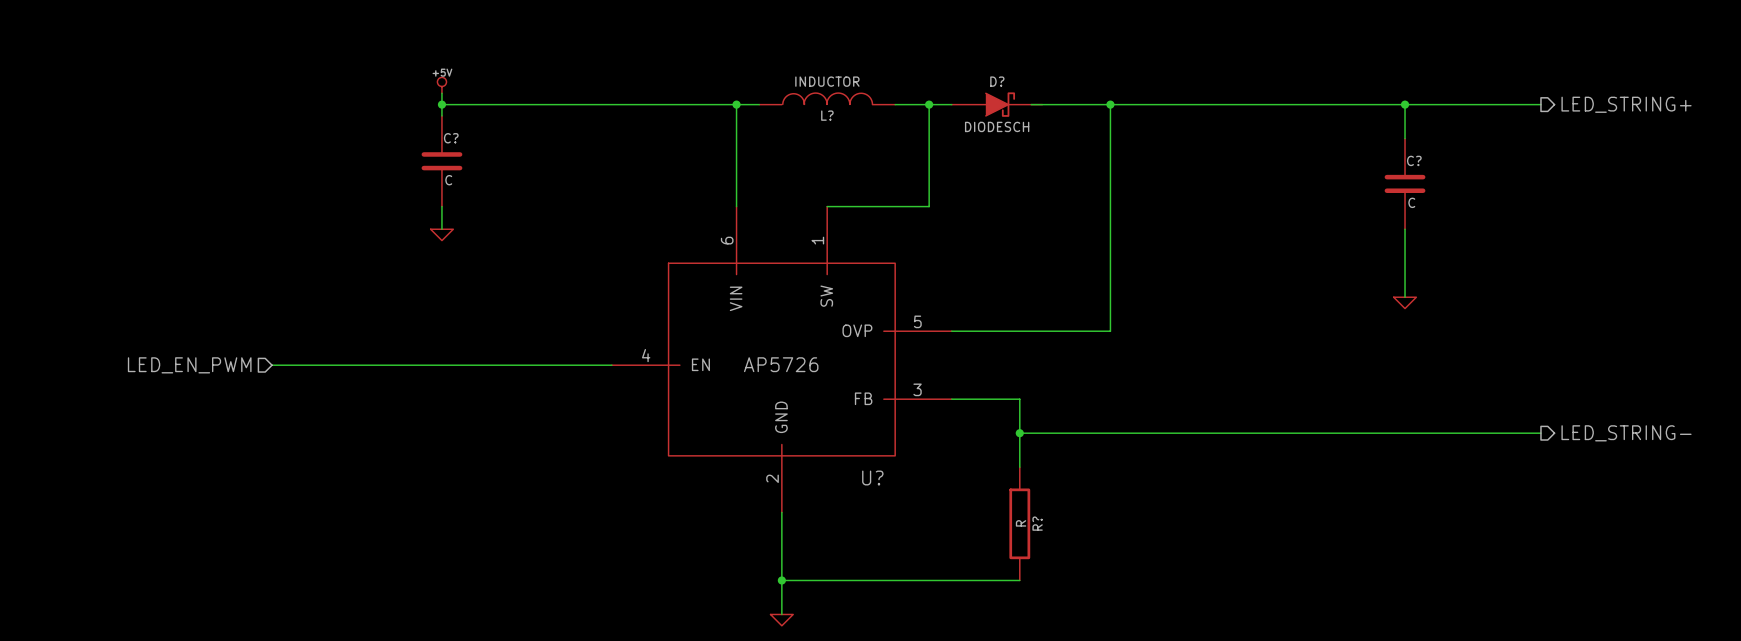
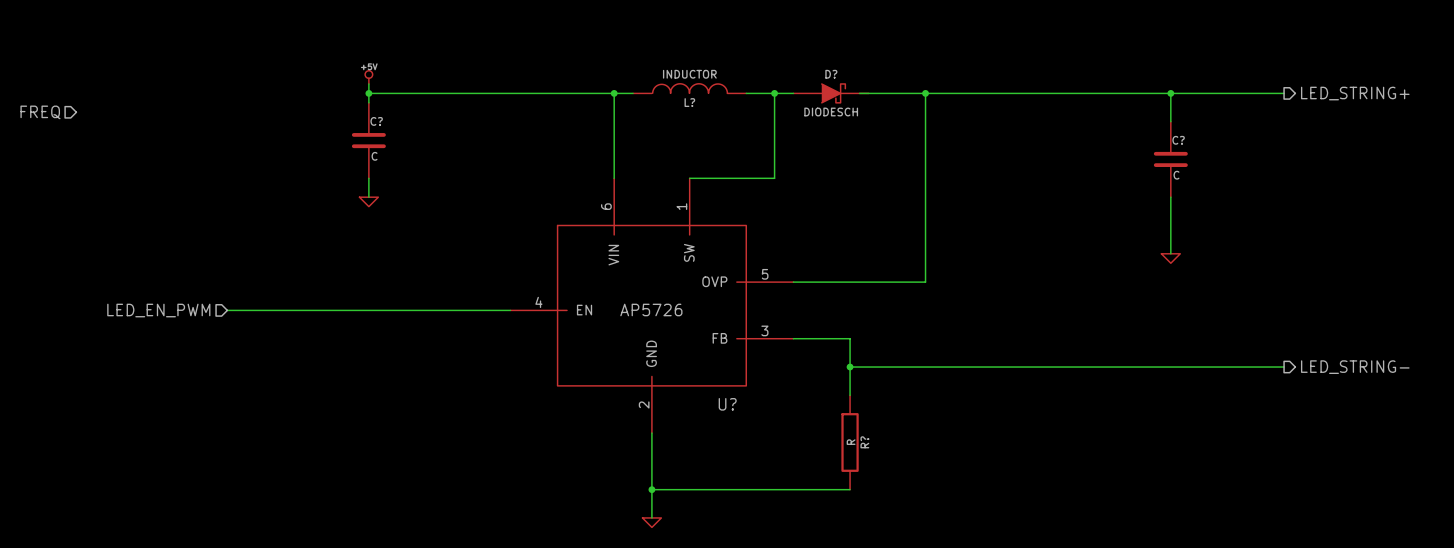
hierarchical label: none -> FREQ (40, 112)

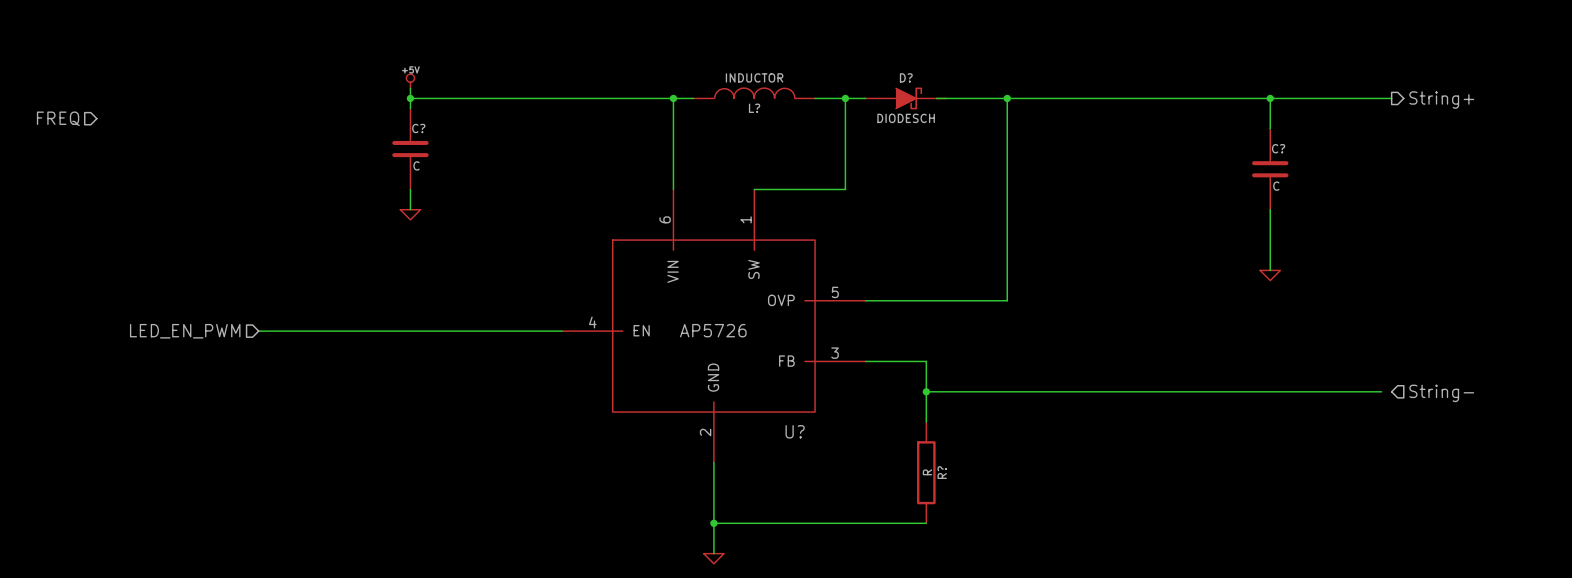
hierarchical label: LED_STRING+ (1355, 93) -> String+ (1441, 100)
wire: (1274, 367) (1284, 367) -> none
hierarchical label shape: output (1355, 367) -> input (1441, 393)
hierarchical label: LED_STRING- (1355, 367) -> String- (1441, 393)

